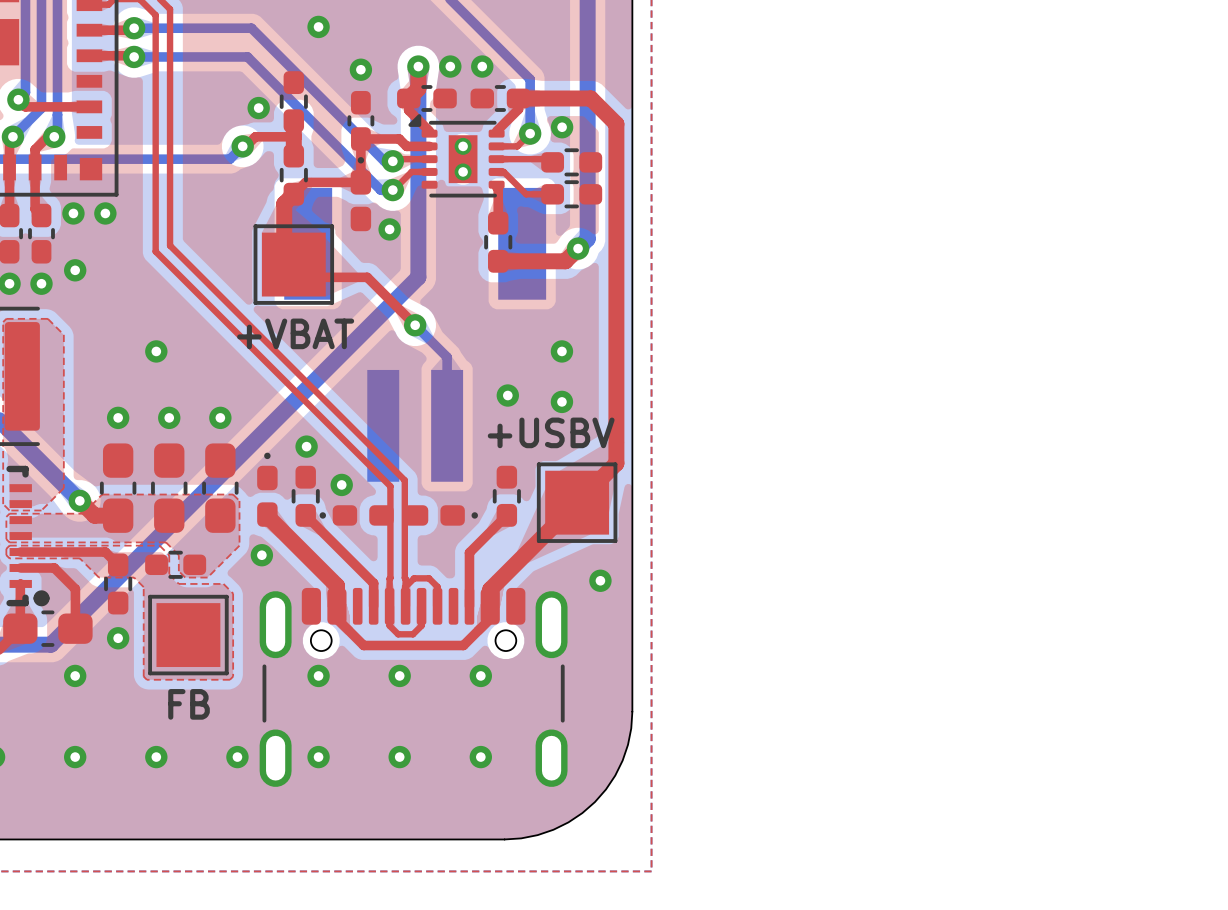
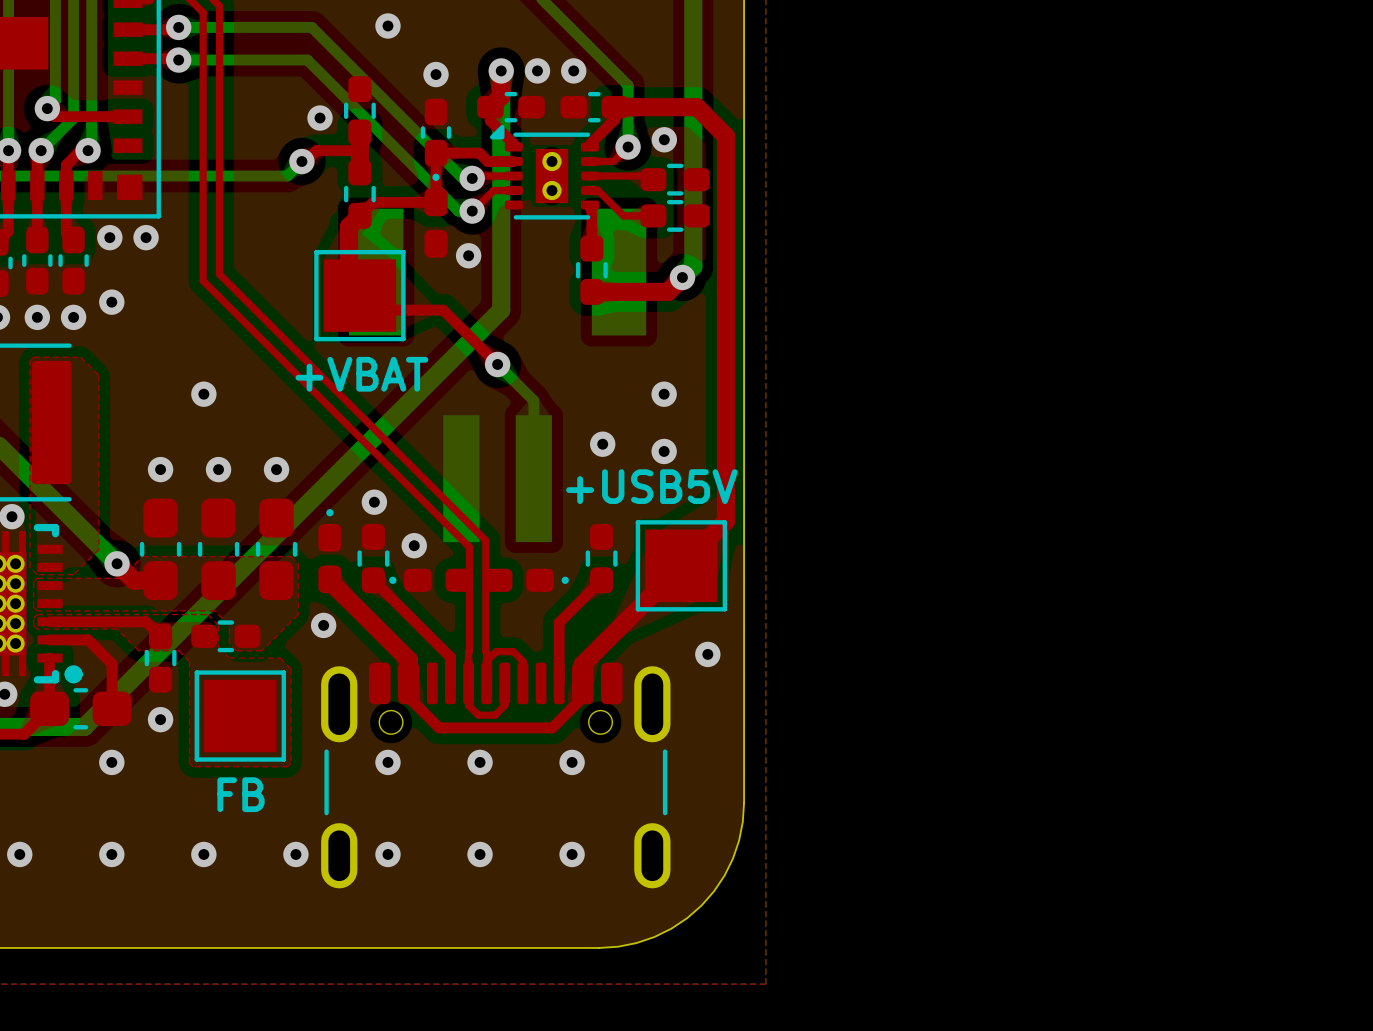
+USBV name: +USBV (551, 432) -> +USB5V (651, 486)

